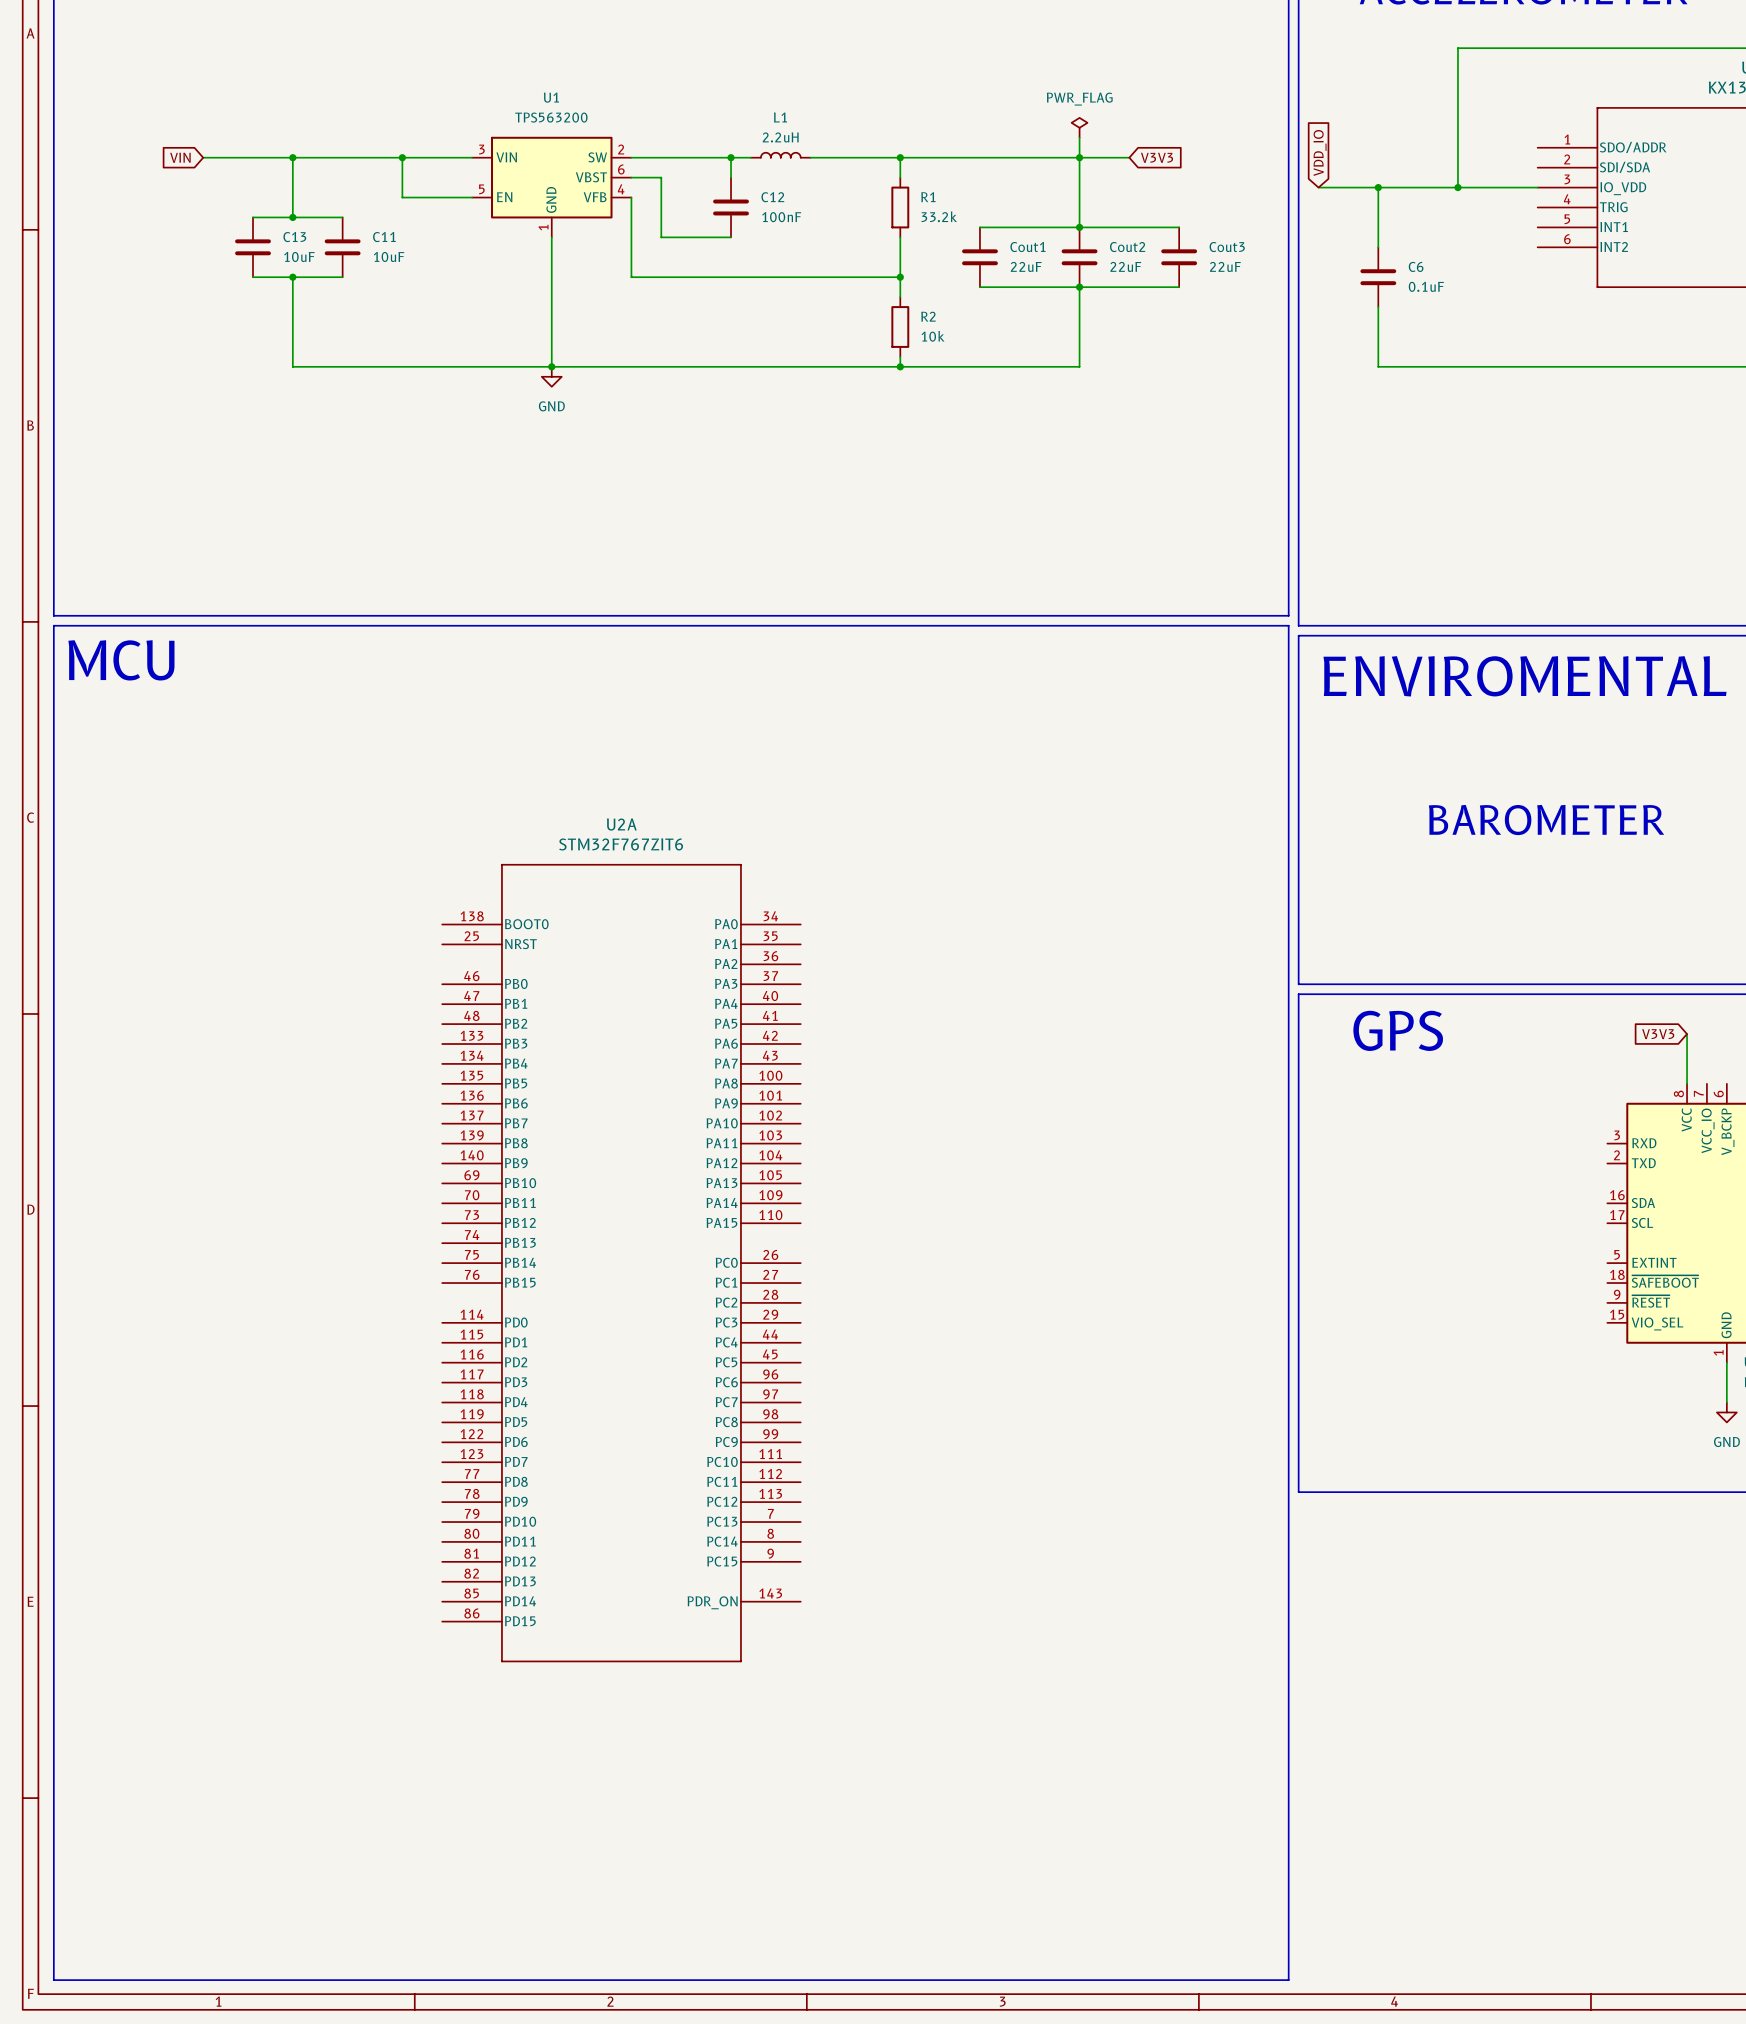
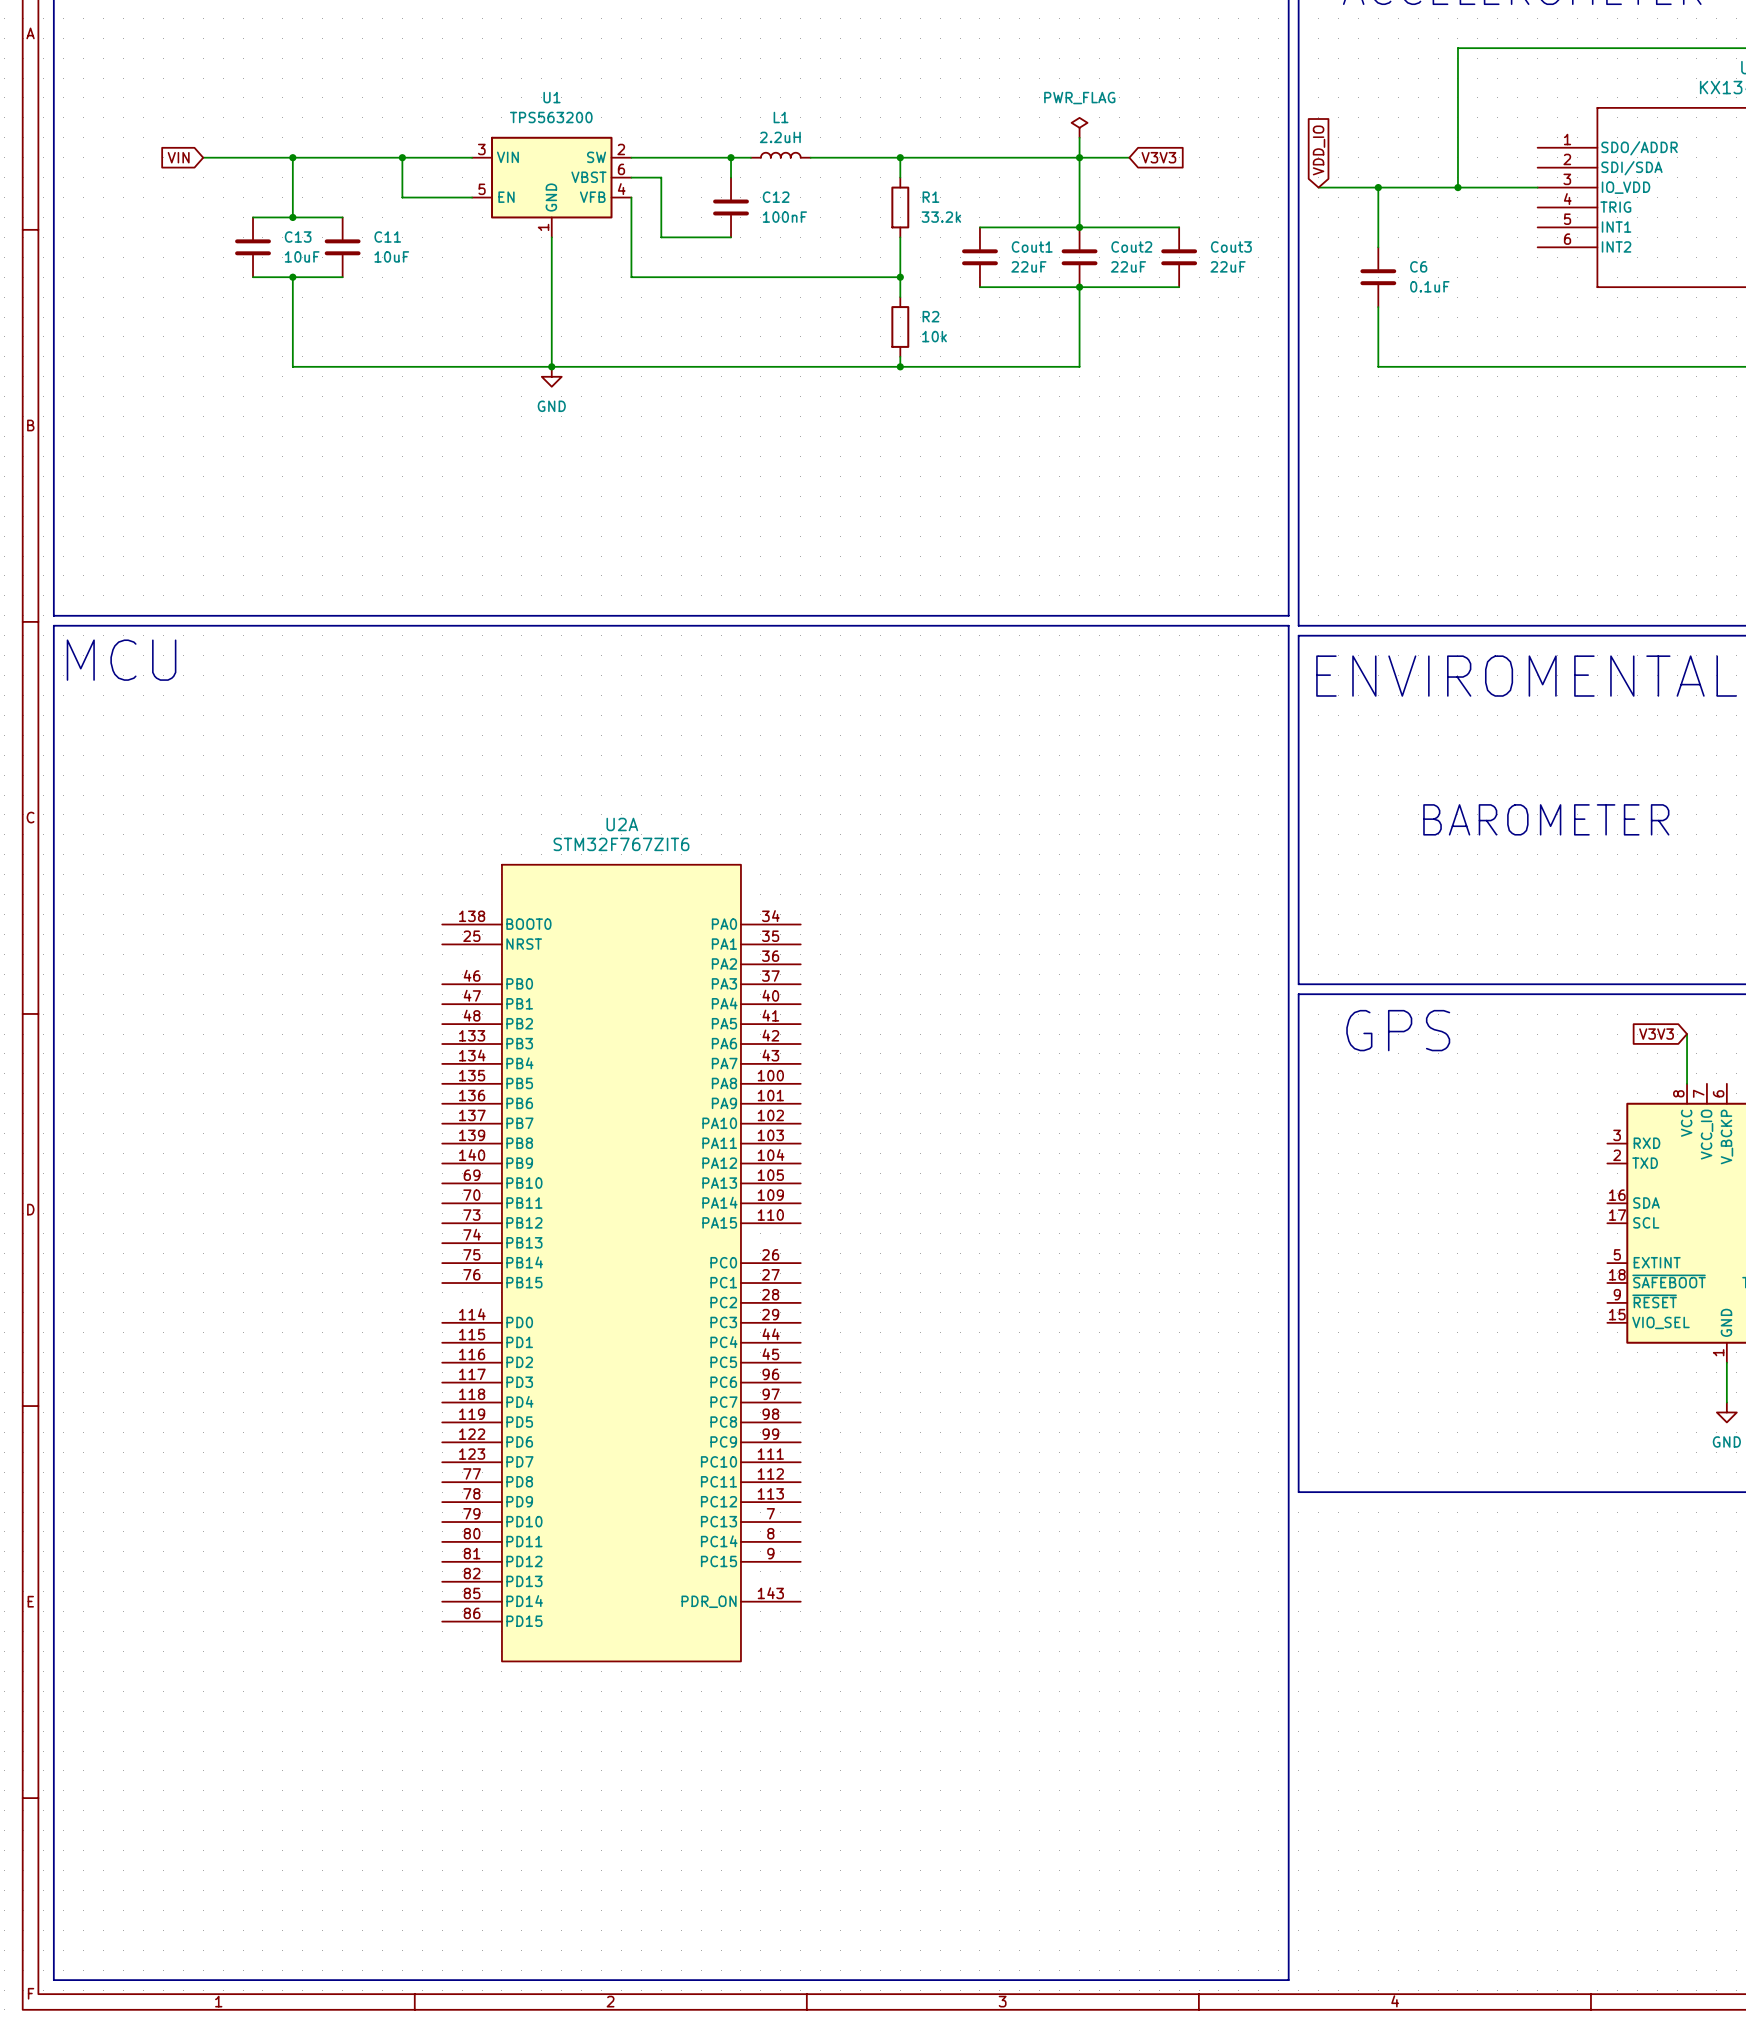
U2A symbol: [442, 864, 801, 1662] -> [442, 864, 801, 1662]

